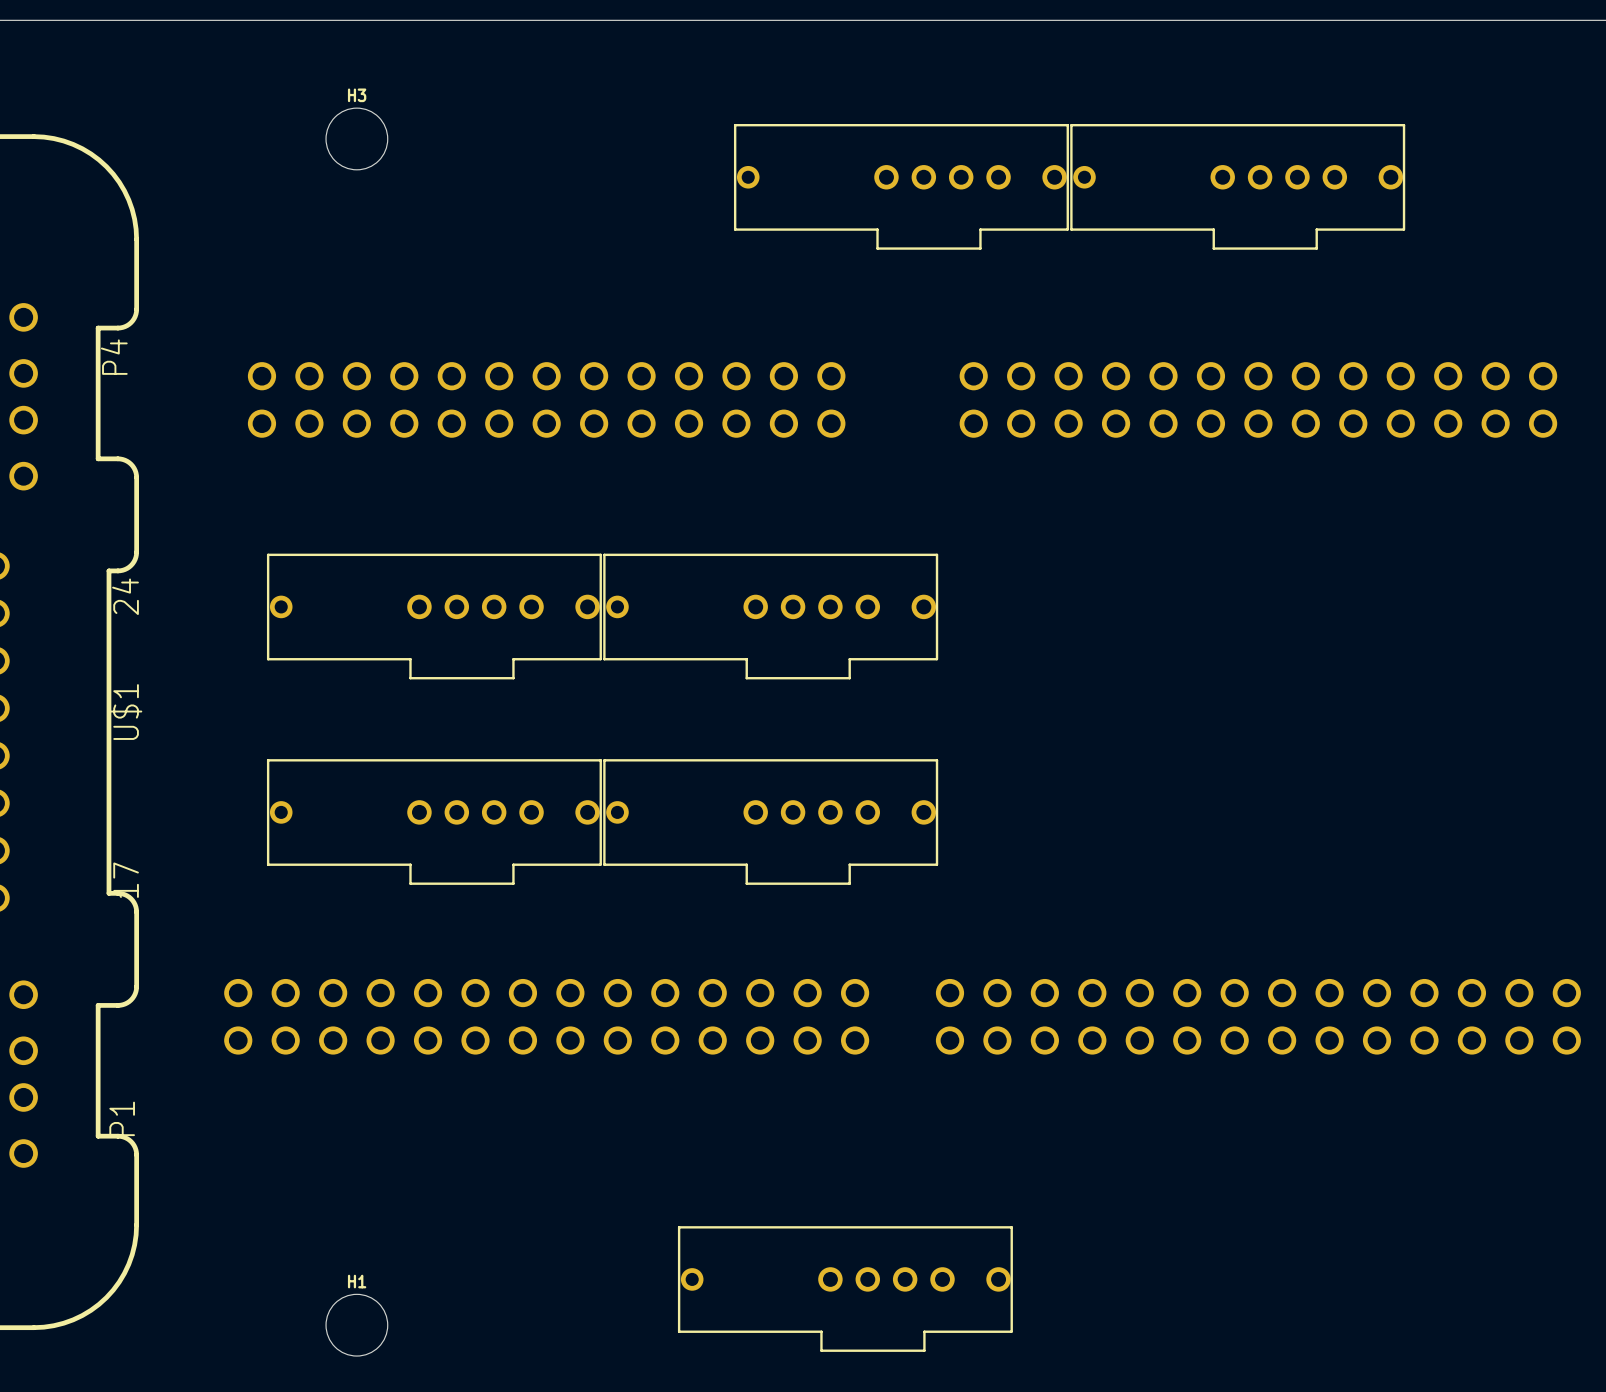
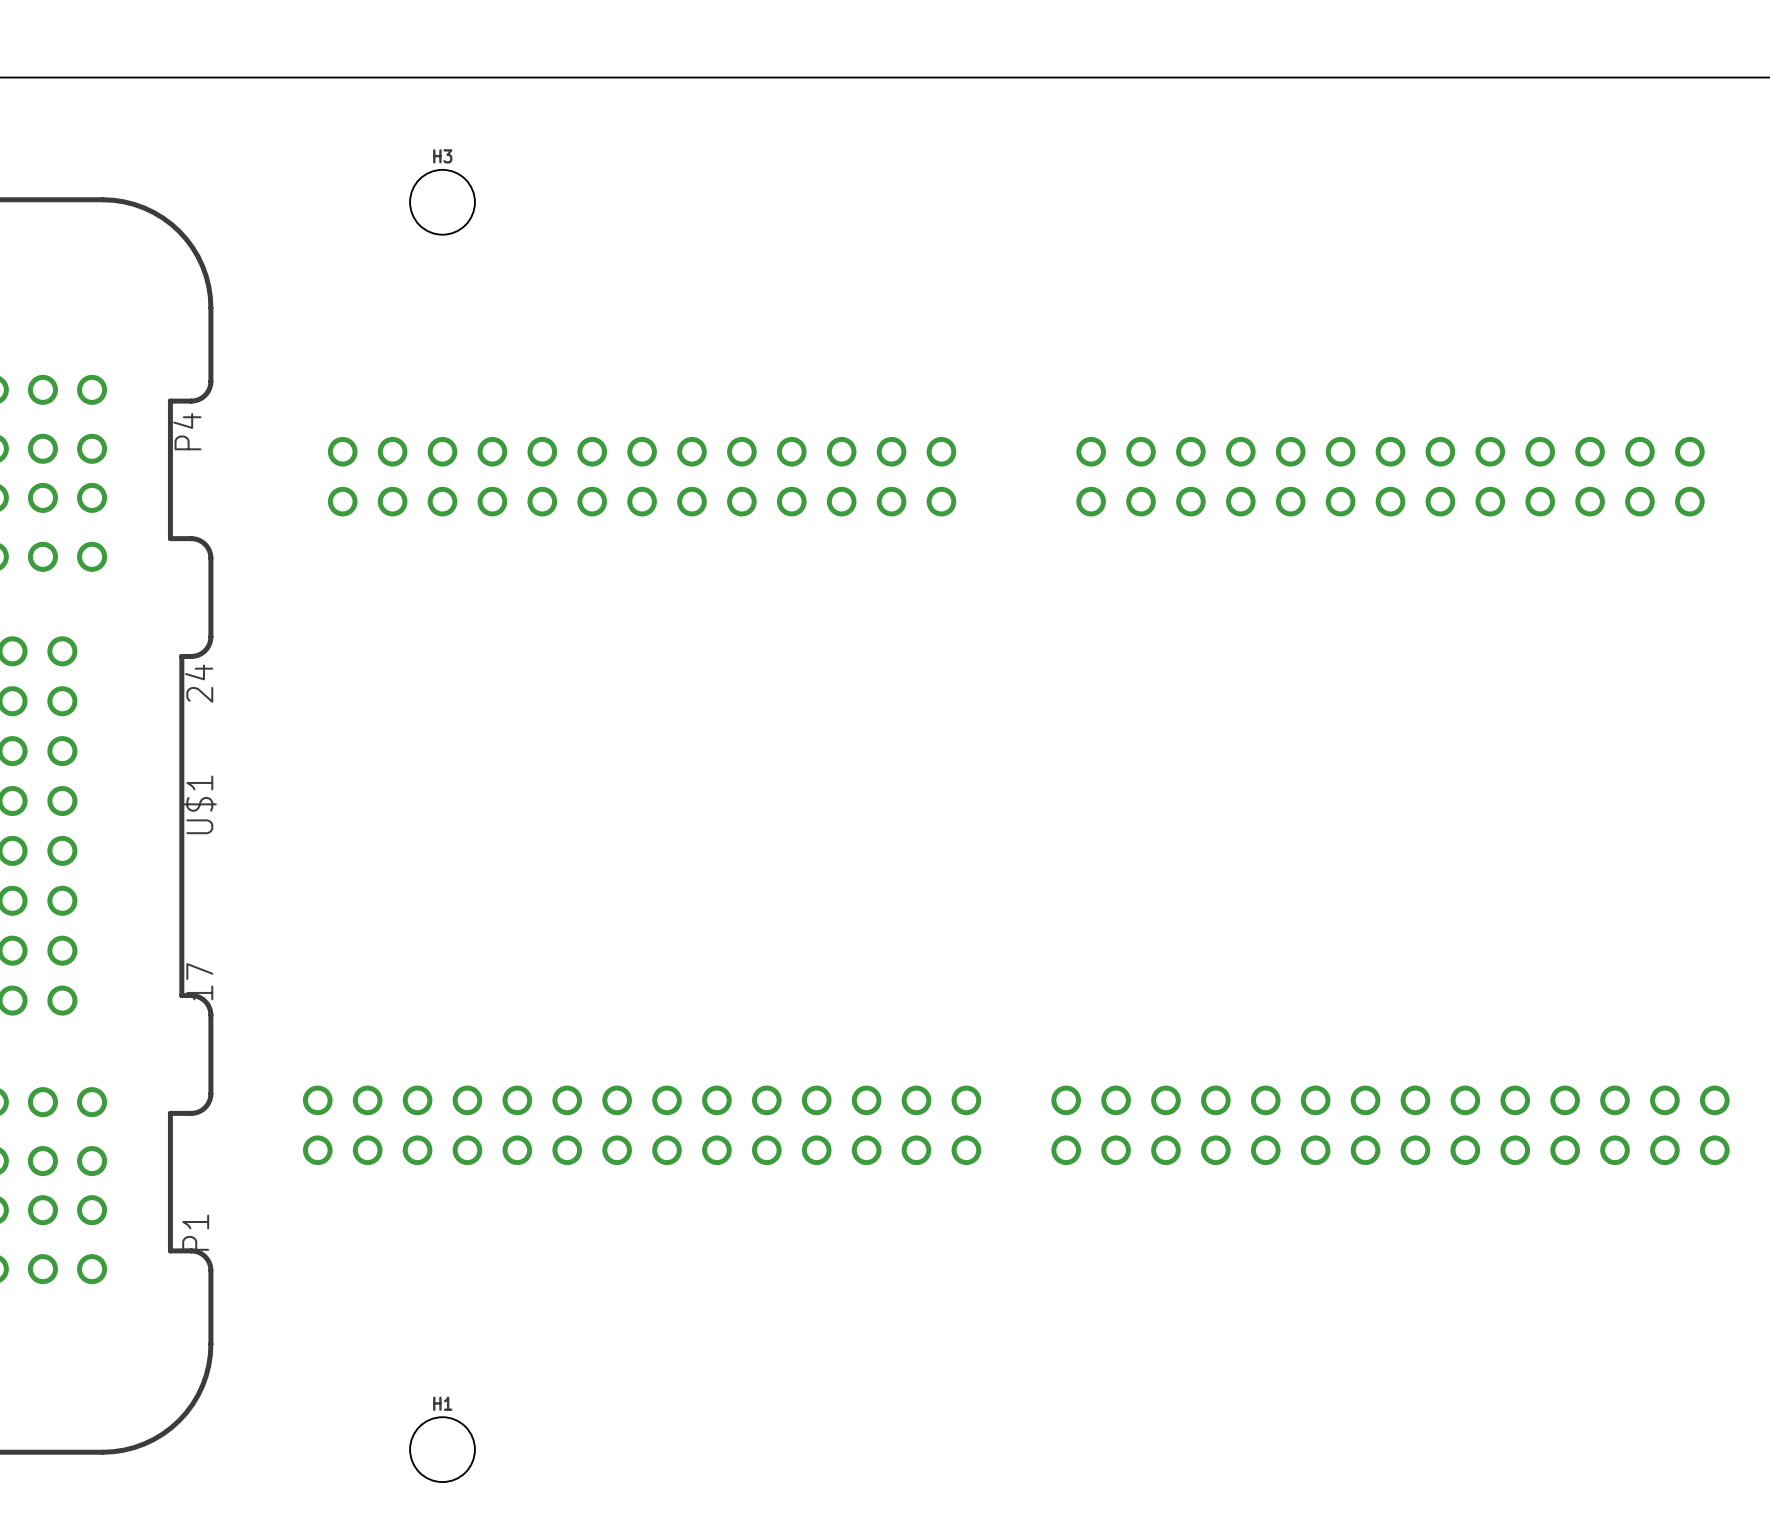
part: (901, 186) -> none
part: (1237, 186) -> none
part: (434, 616) -> none
part: (770, 616) -> none
part: (434, 822) -> none
part: (770, 822) -> none
part: (845, 1289) -> none

